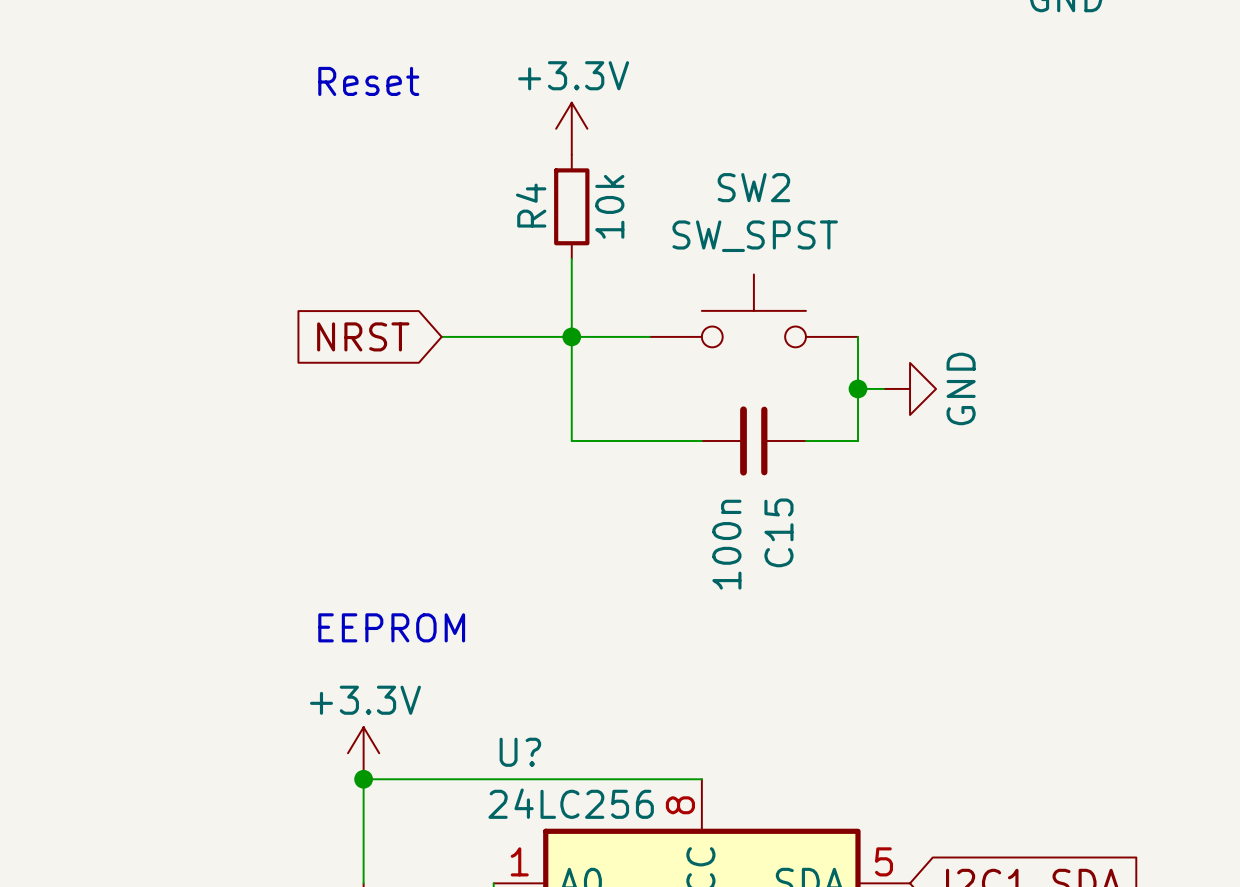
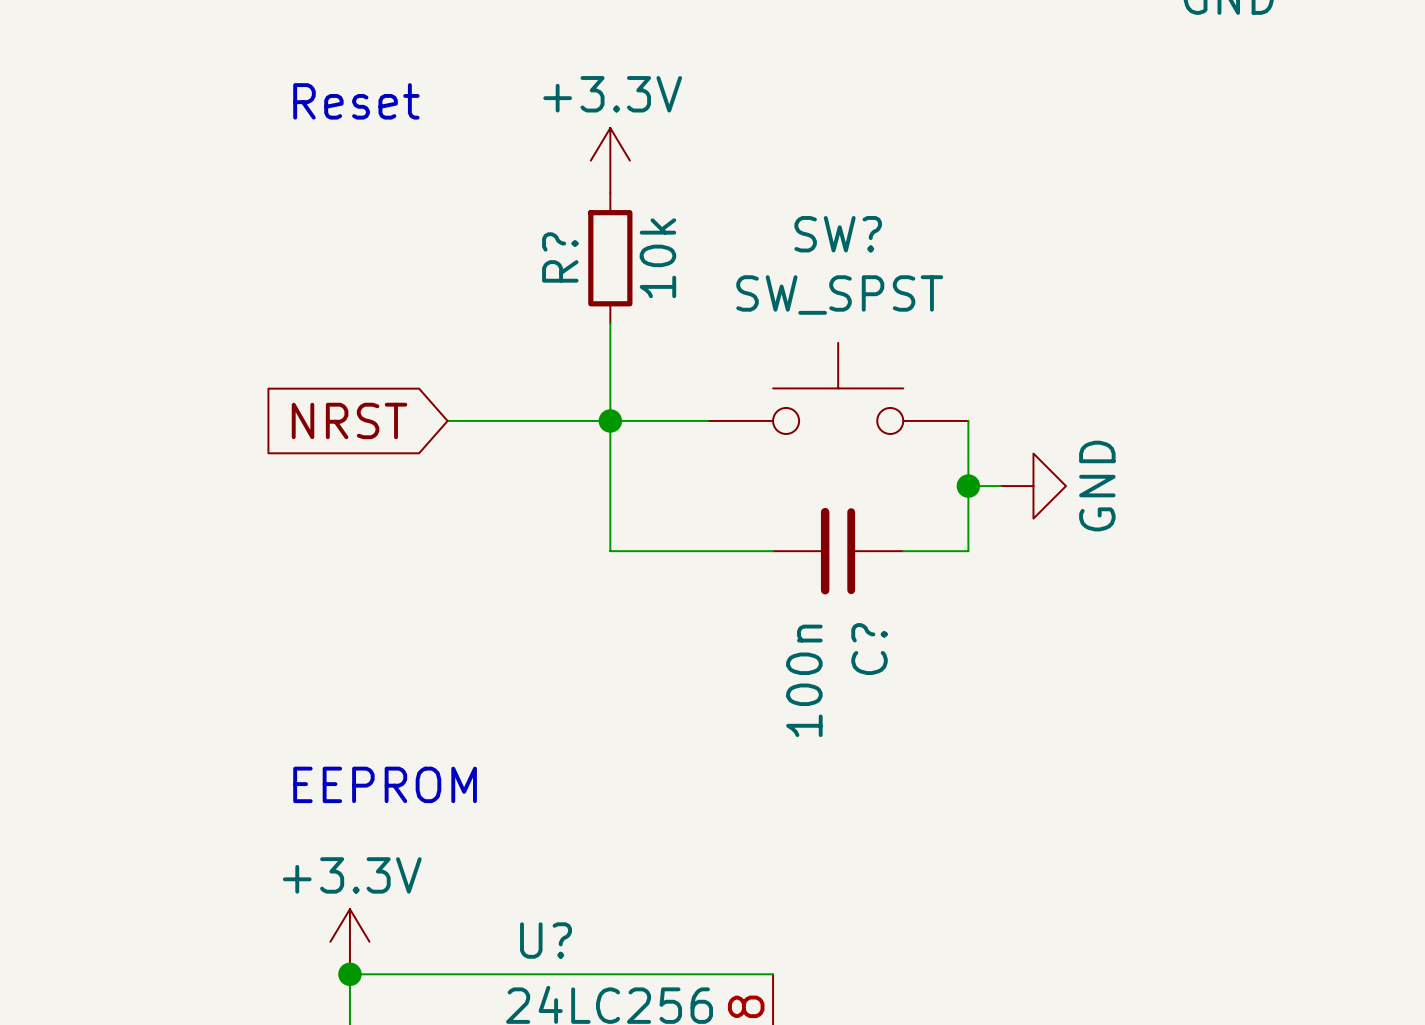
SW2 name: SW2 (753, 187) -> SW? (838, 234)
R4 name: R4 (531, 205) -> R? (560, 257)
C15 name: C15 (778, 532) -> C? (869, 649)

